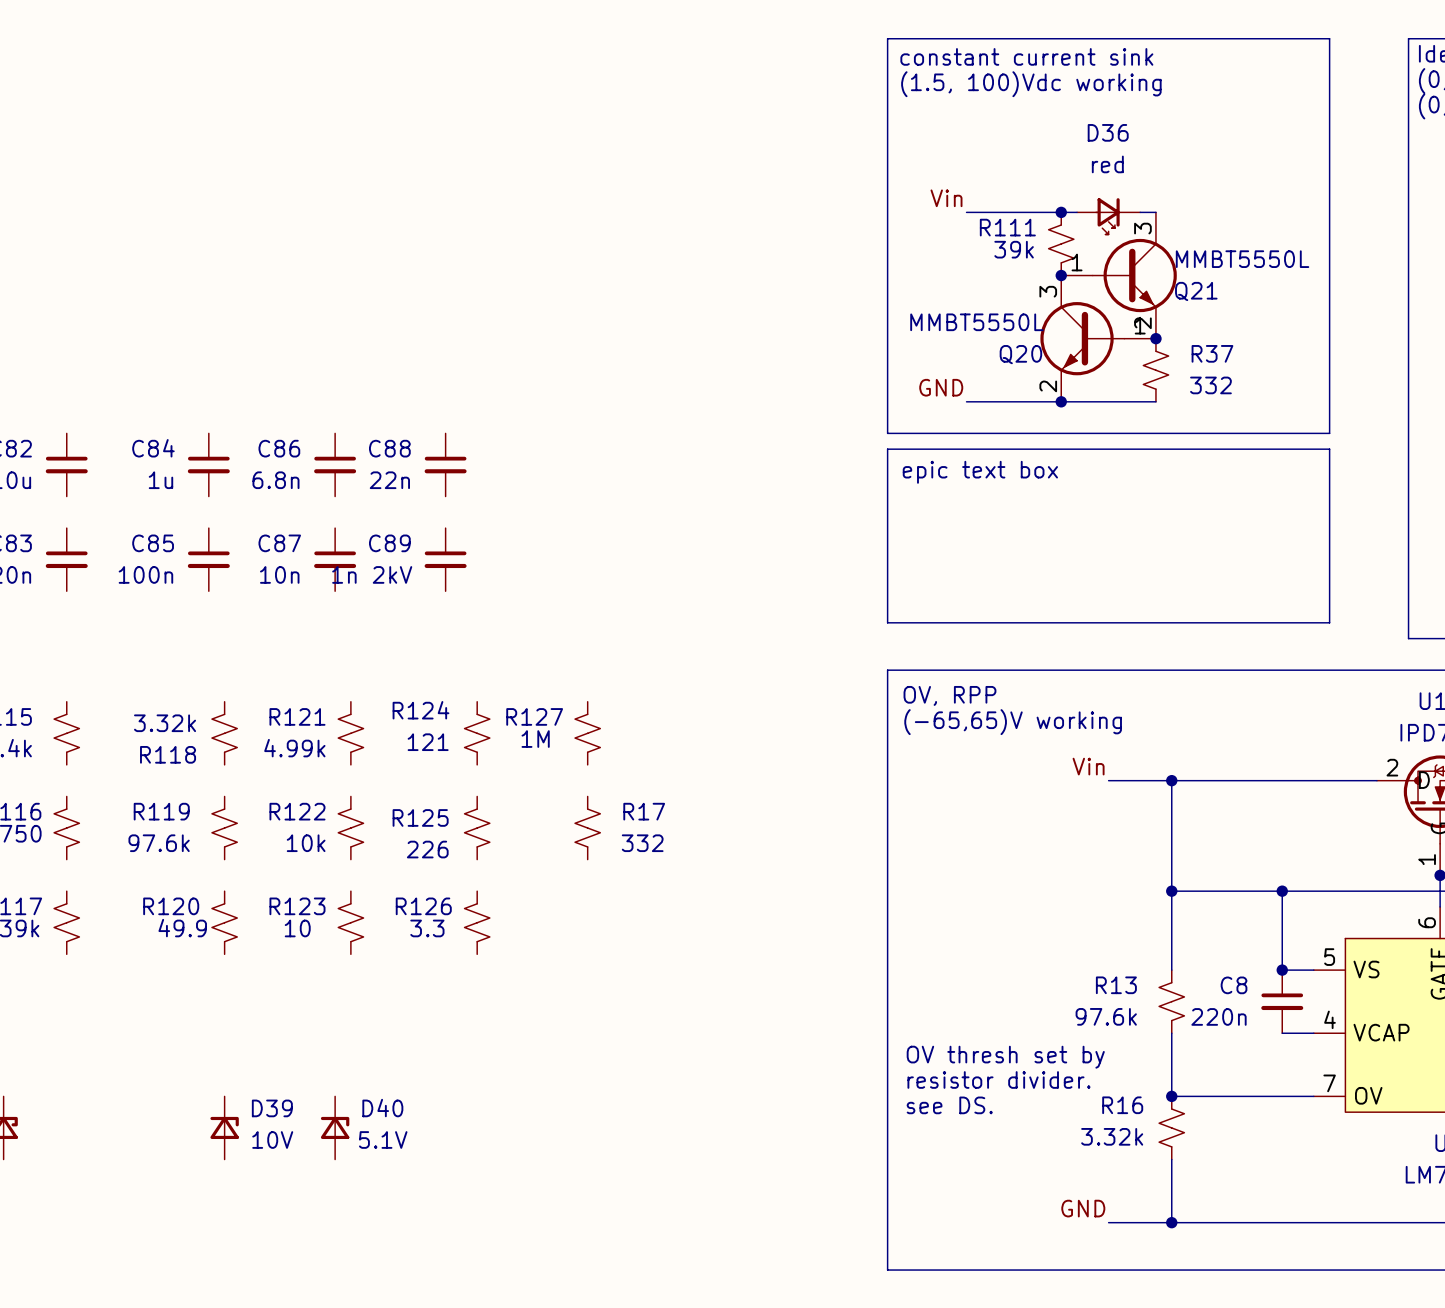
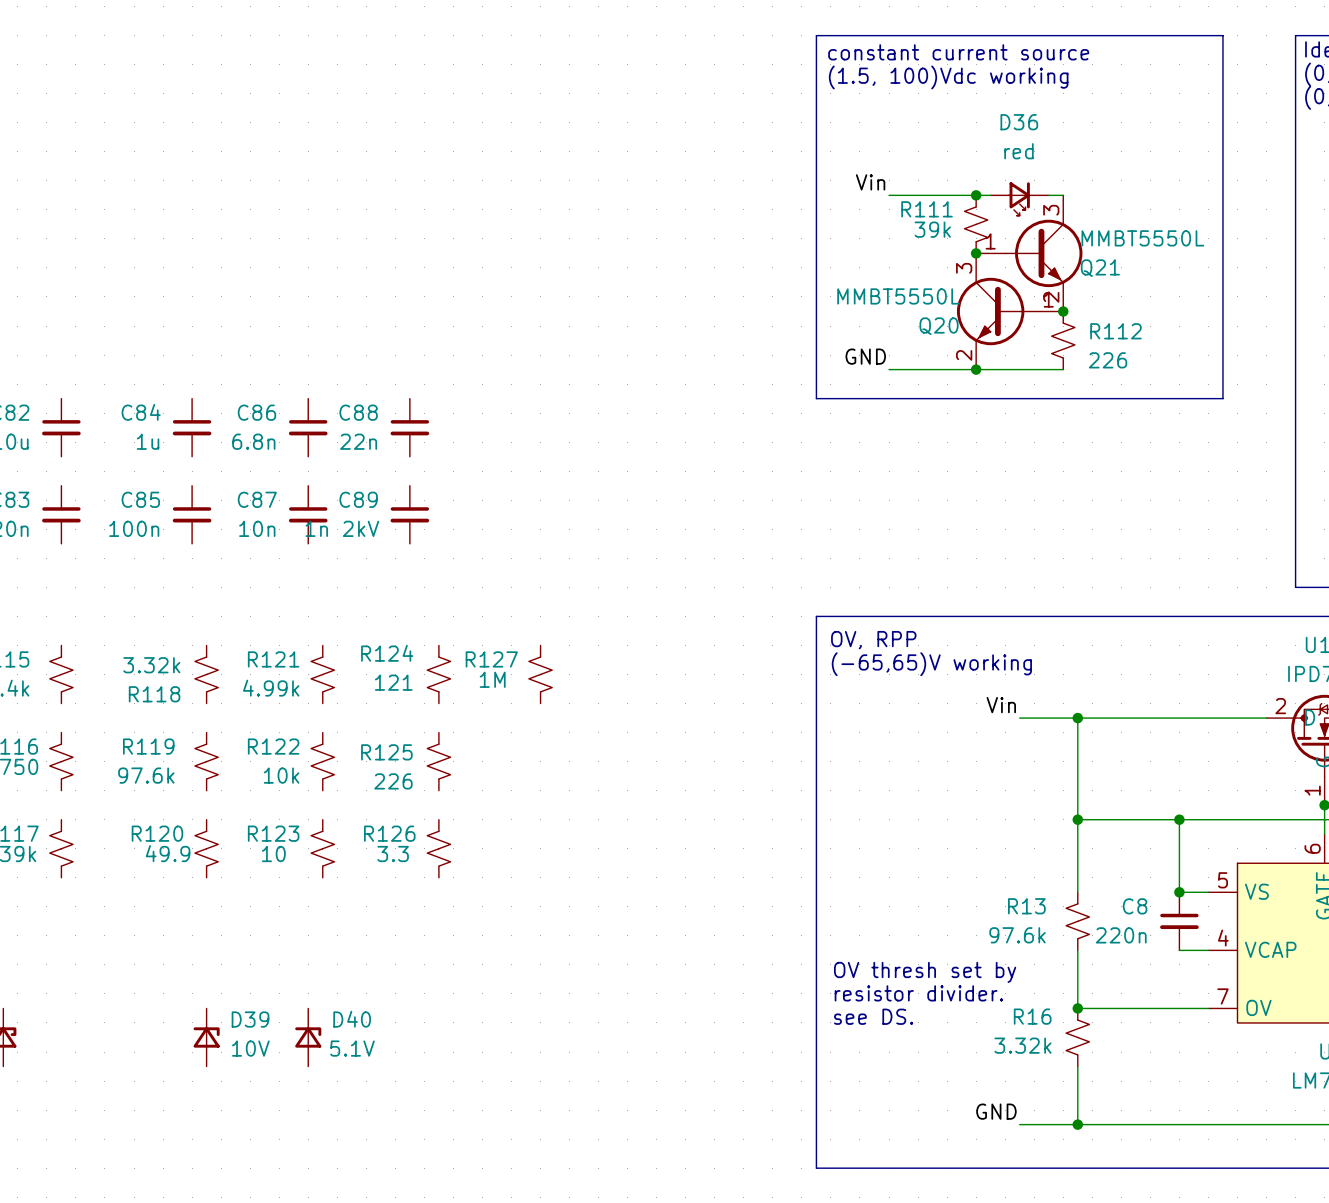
text: constant current sink (1026, 56) -> constant current source (958, 52)
R37 name: R37 (1212, 353) -> R112 (1115, 331)
R37 value: 332 (1210, 385) -> 226 (1108, 360)
line: (887, 449) (1329, 449) (1329, 622) (887, 622) (887, 449) -> none
text: epic text box (980, 472) -> none
R17: 332 (587, 828) -> none

